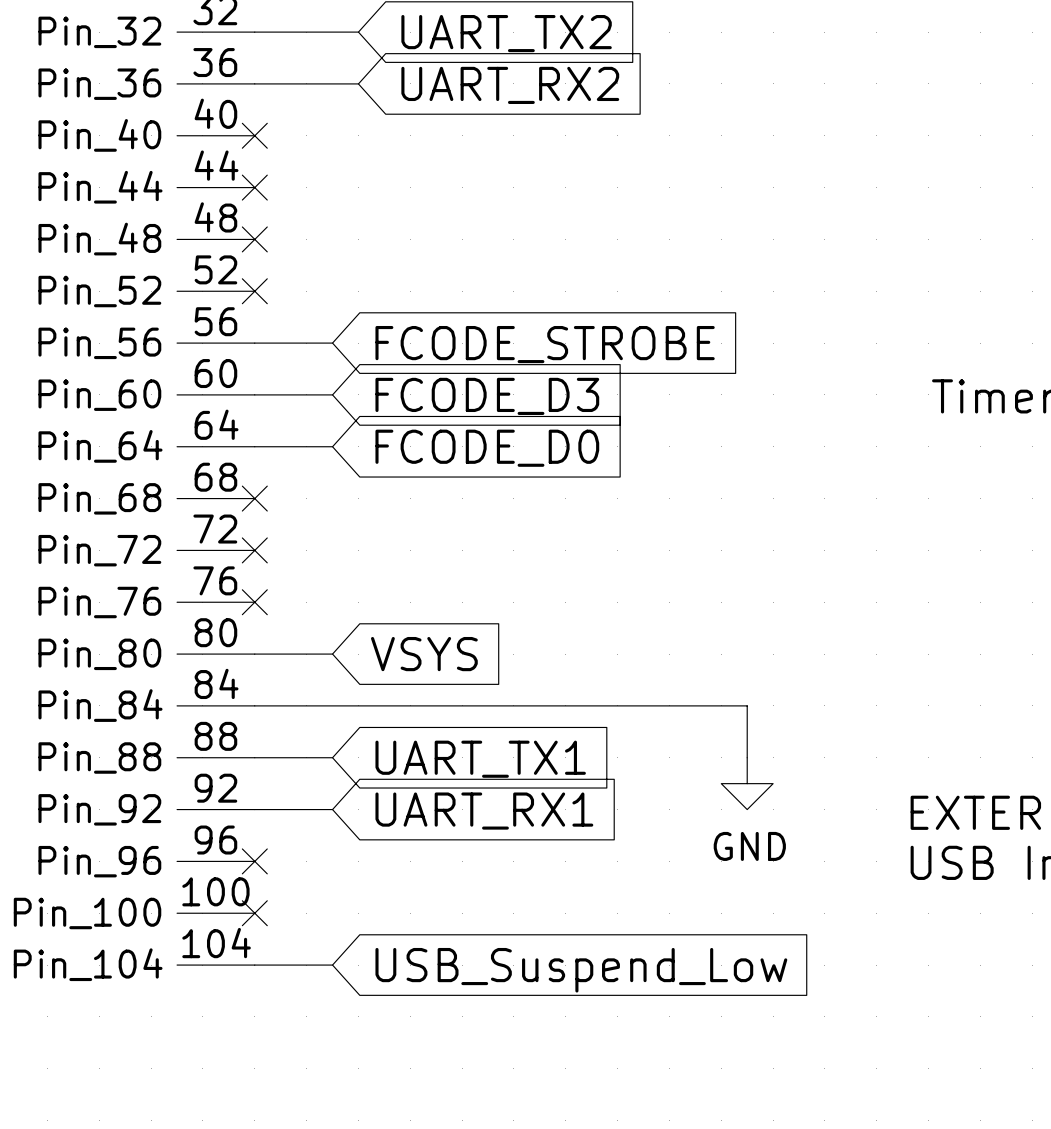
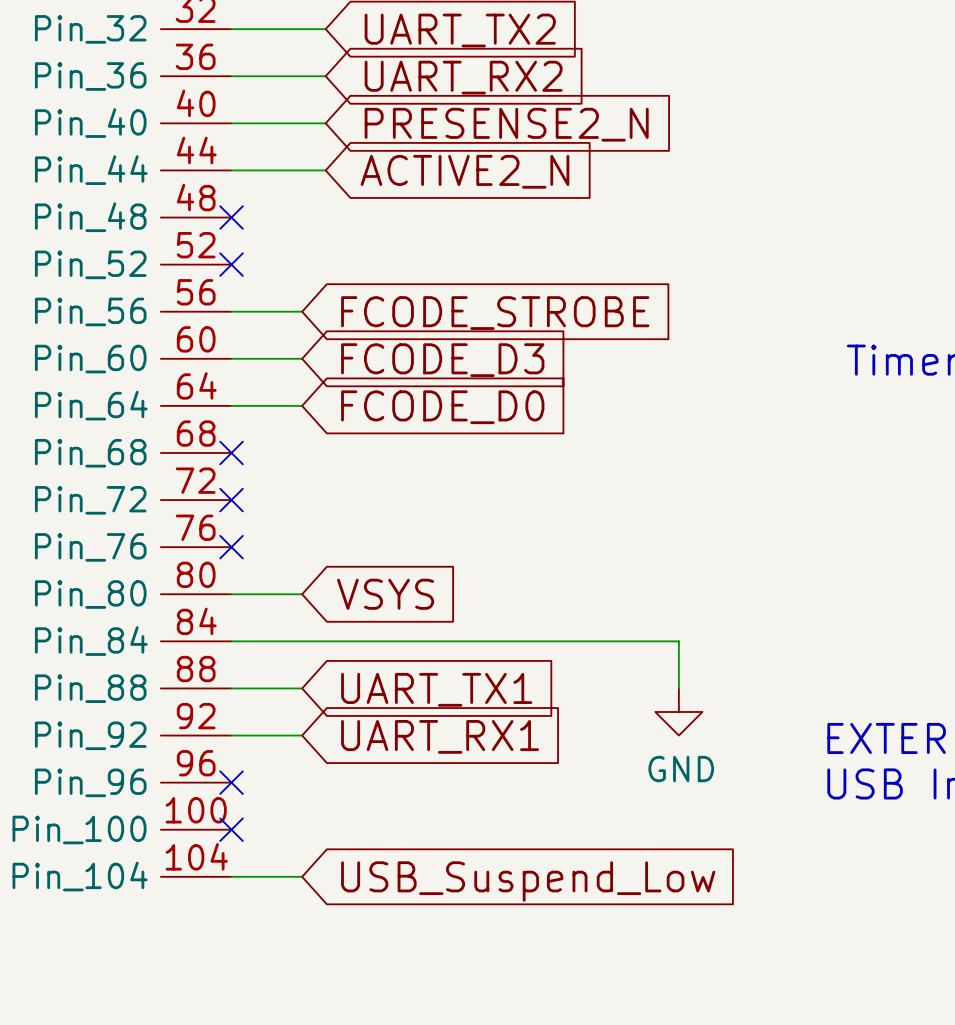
wire: none -> (231, 123) (325, 123)
no-connect mark: (254, 135) -> none
global label: none -> PRESENSE2_N (506, 124)
wire: none -> (231, 170) (325, 170)
no-connect mark: (254, 187) -> none
global label: none -> ACTIVE2_N (464, 171)

